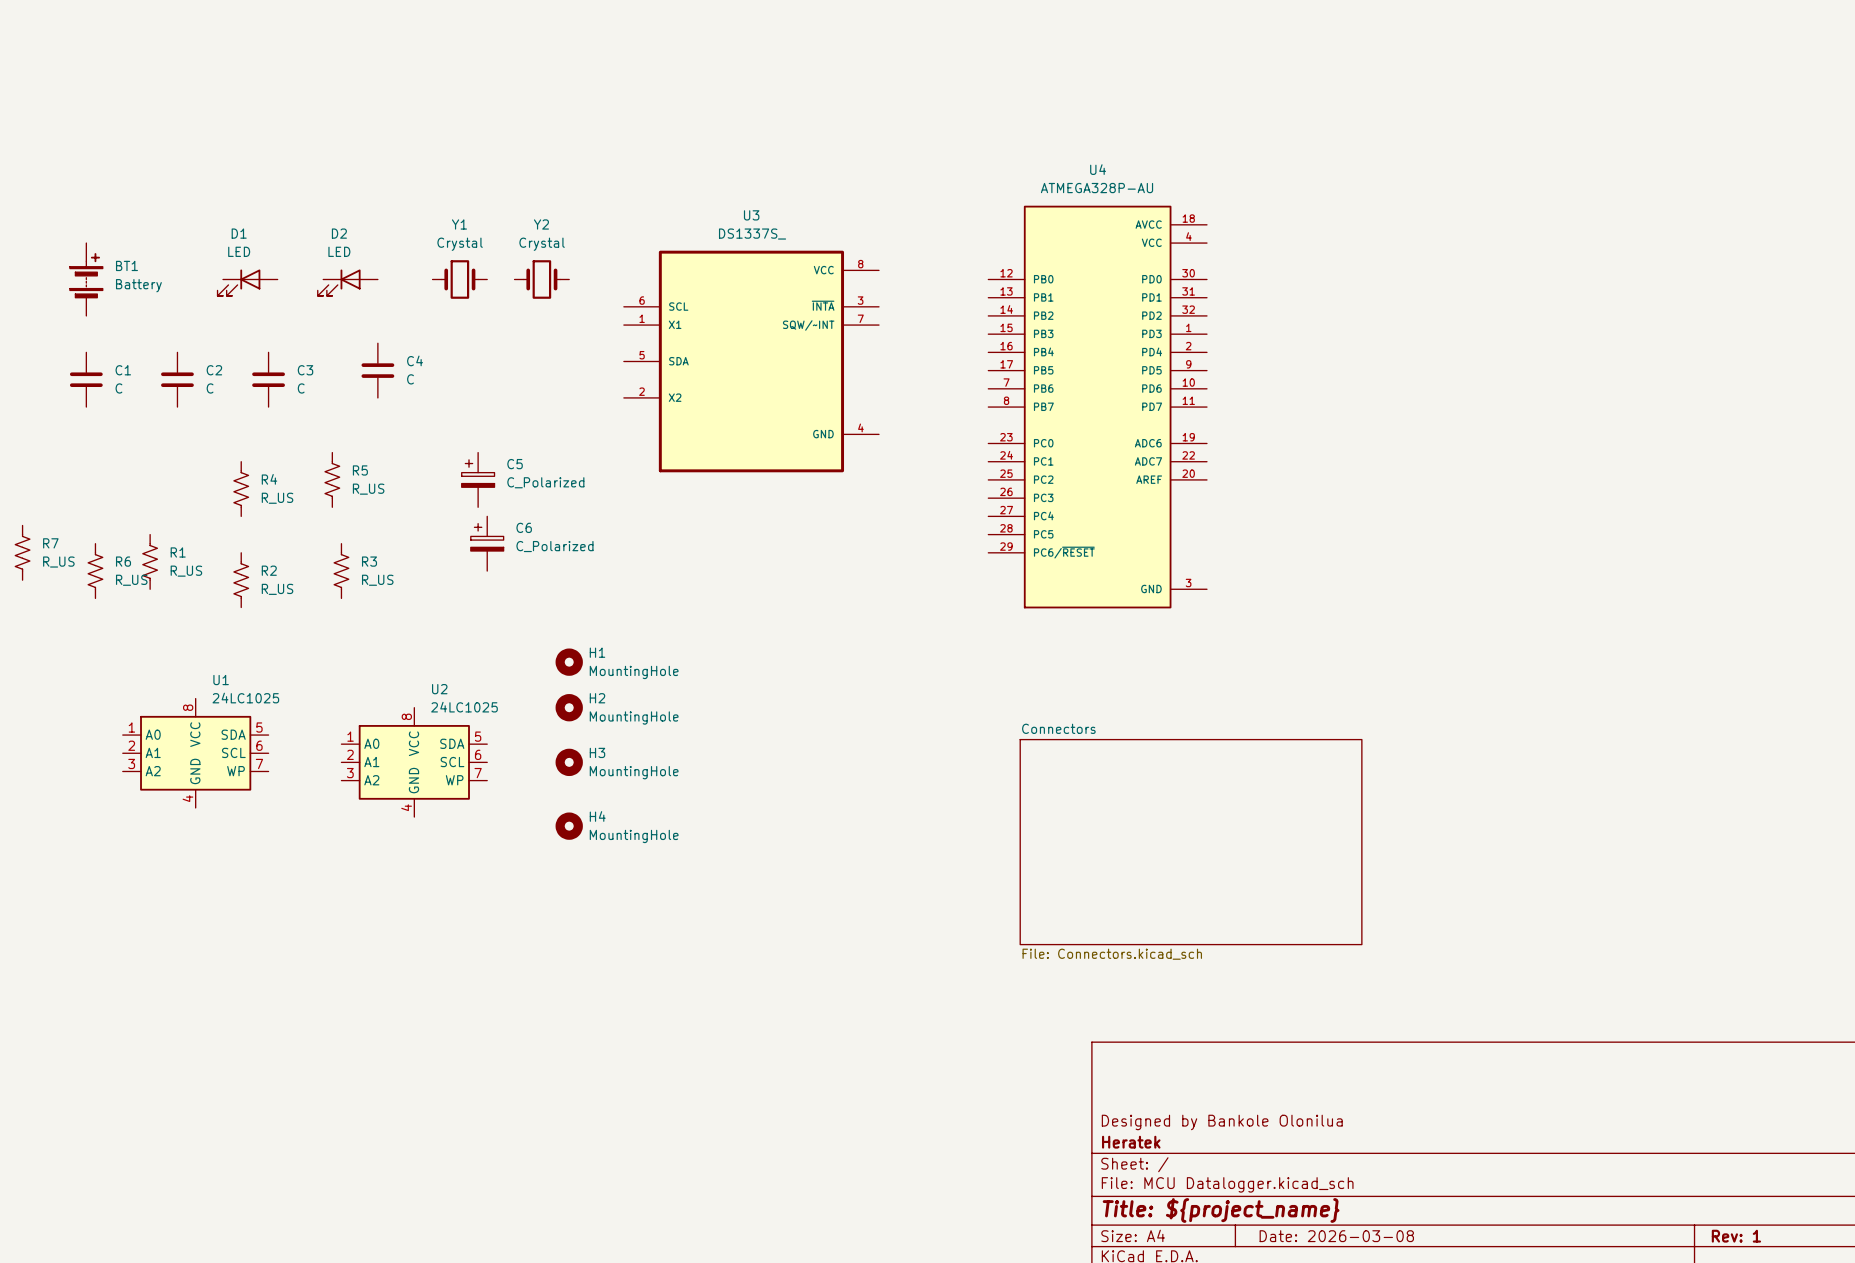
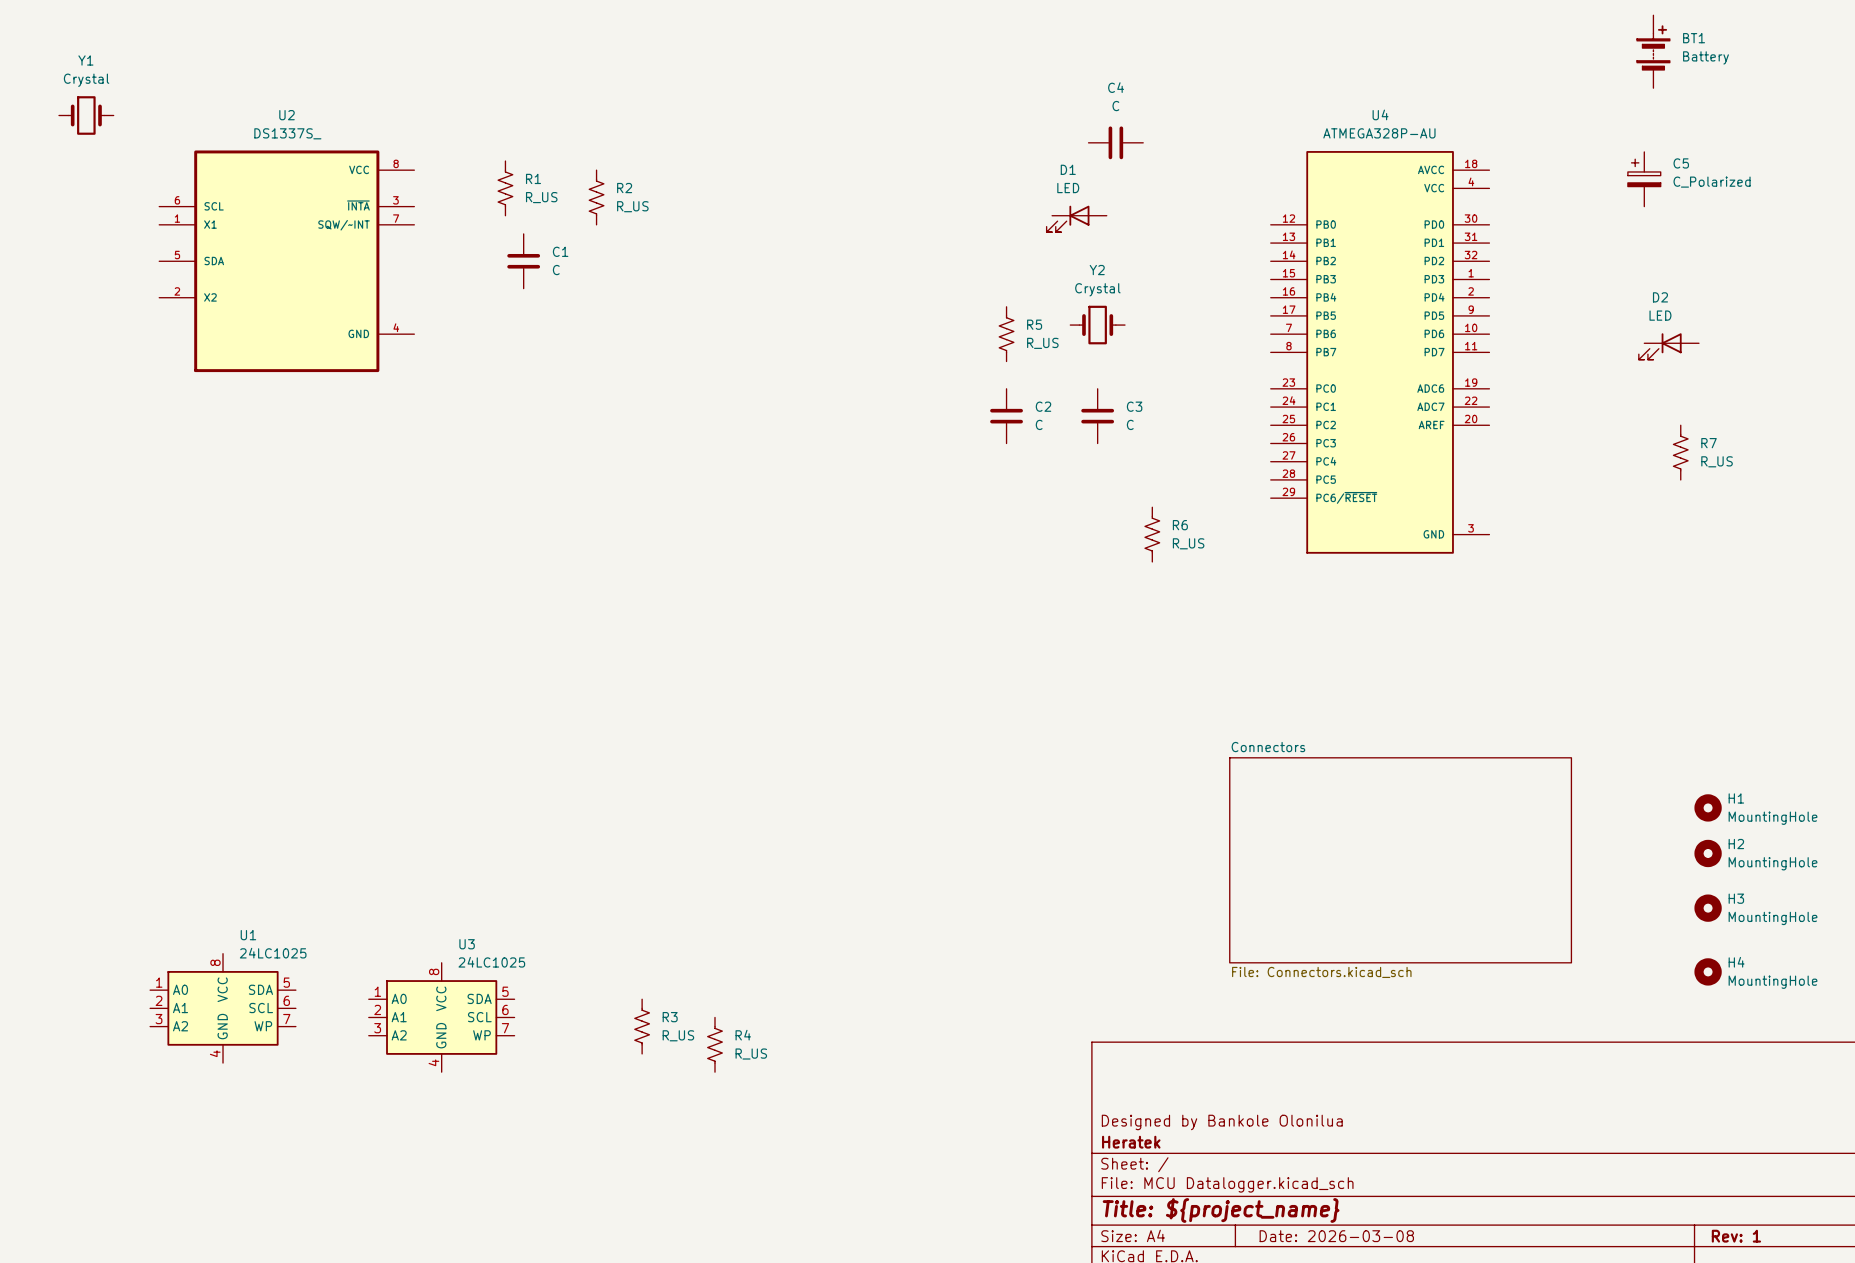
U3 name position: U3 (751, 215) -> U3 (467, 944)
U3 value: DS1337S_ (752, 234) -> 24LC1025 (491, 962)
U3 symbol: [623, 250, 879, 473] -> [368, 962, 515, 1073]
BT1 position: (86, 279) -> (1653, 51)
Y1 position: (459, 279) -> (86, 115)
Y2 position: (541, 279) -> (1097, 325)
D1 position: (247, 282) -> (1076, 218)
D2 position: (347, 282) -> (1668, 346)
C4 name position: C4 (415, 360) -> C4 (1116, 87)
C4 rotation: 0° (377, 370) -> 90° clockwise (1115, 142)
C4 position: (377, 370) -> (1115, 142)
C1 position: (86, 379) -> (523, 261)
C2 position: (177, 379) -> (1006, 416)
C3 position: (268, 379) -> (1097, 416)
C4 value position: C (410, 379) -> C (1115, 106)
U4 position: (1097, 407) -> (1380, 352)
R5 position: (332, 479) -> (1006, 334)
C5 position: (478, 479) -> (1644, 179)
R4 position: (241, 489) -> (714, 1044)
C6: C_Polarized (487, 543) -> none
R7 position: (22, 552) -> (1680, 452)
R1 position: (150, 561) -> (505, 188)
R6 position: (95, 571) -> (1152, 534)
R3 position: (341, 571) -> (642, 1026)
R2 position: (241, 580) -> (596, 197)
H1 position: (569, 662) -> (1708, 807)
U2 name position: U2 (439, 689) -> U2 (287, 115)
U2 symbol: [341, 707, 488, 818] -> [159, 150, 415, 373]
U2 value: 24LC1025 (464, 707) -> DS1337S_ (287, 133)
H2 position: (569, 707) -> (1708, 853)
U1 position: (195, 753) -> (223, 1008)
H3 position: (569, 762) -> (1708, 908)
H4 position: (569, 826) -> (1708, 971)
sheet Connectors: File: Connectors.kicad_sch (1191, 842) -> none
sheet Connectors: none -> File: Connectors.kicad_sch (1400, 860)

